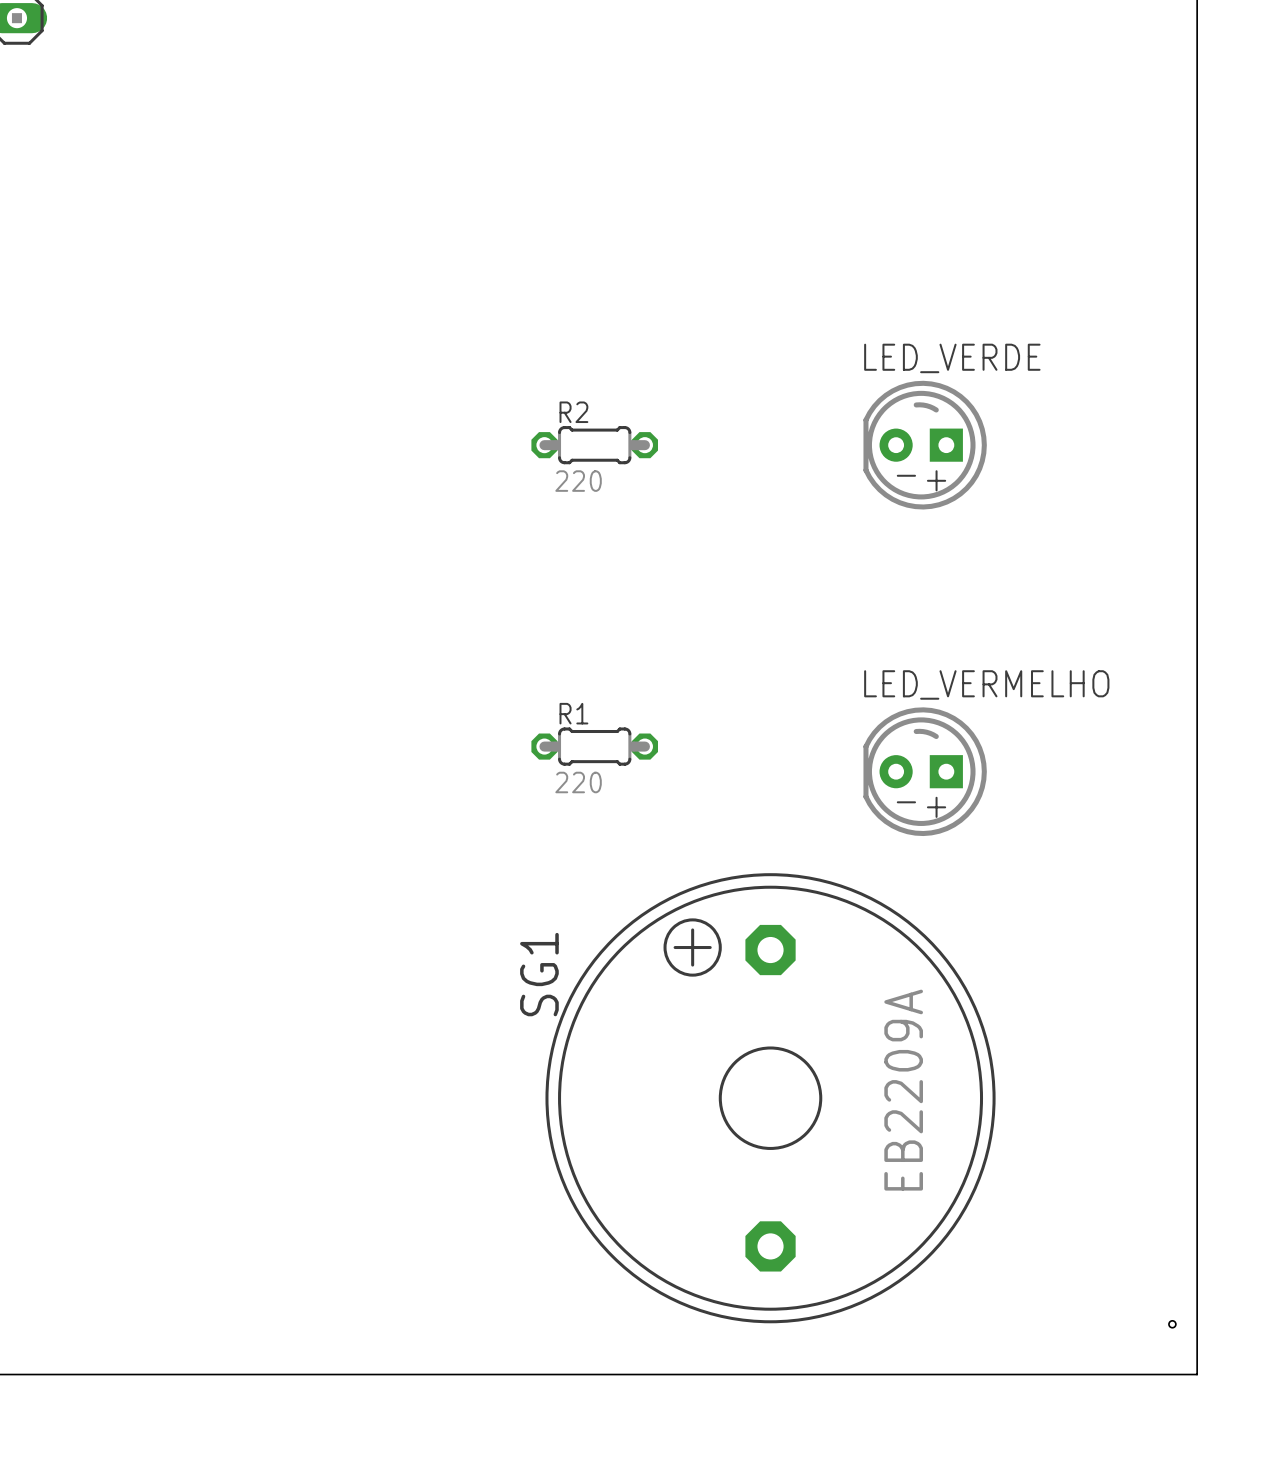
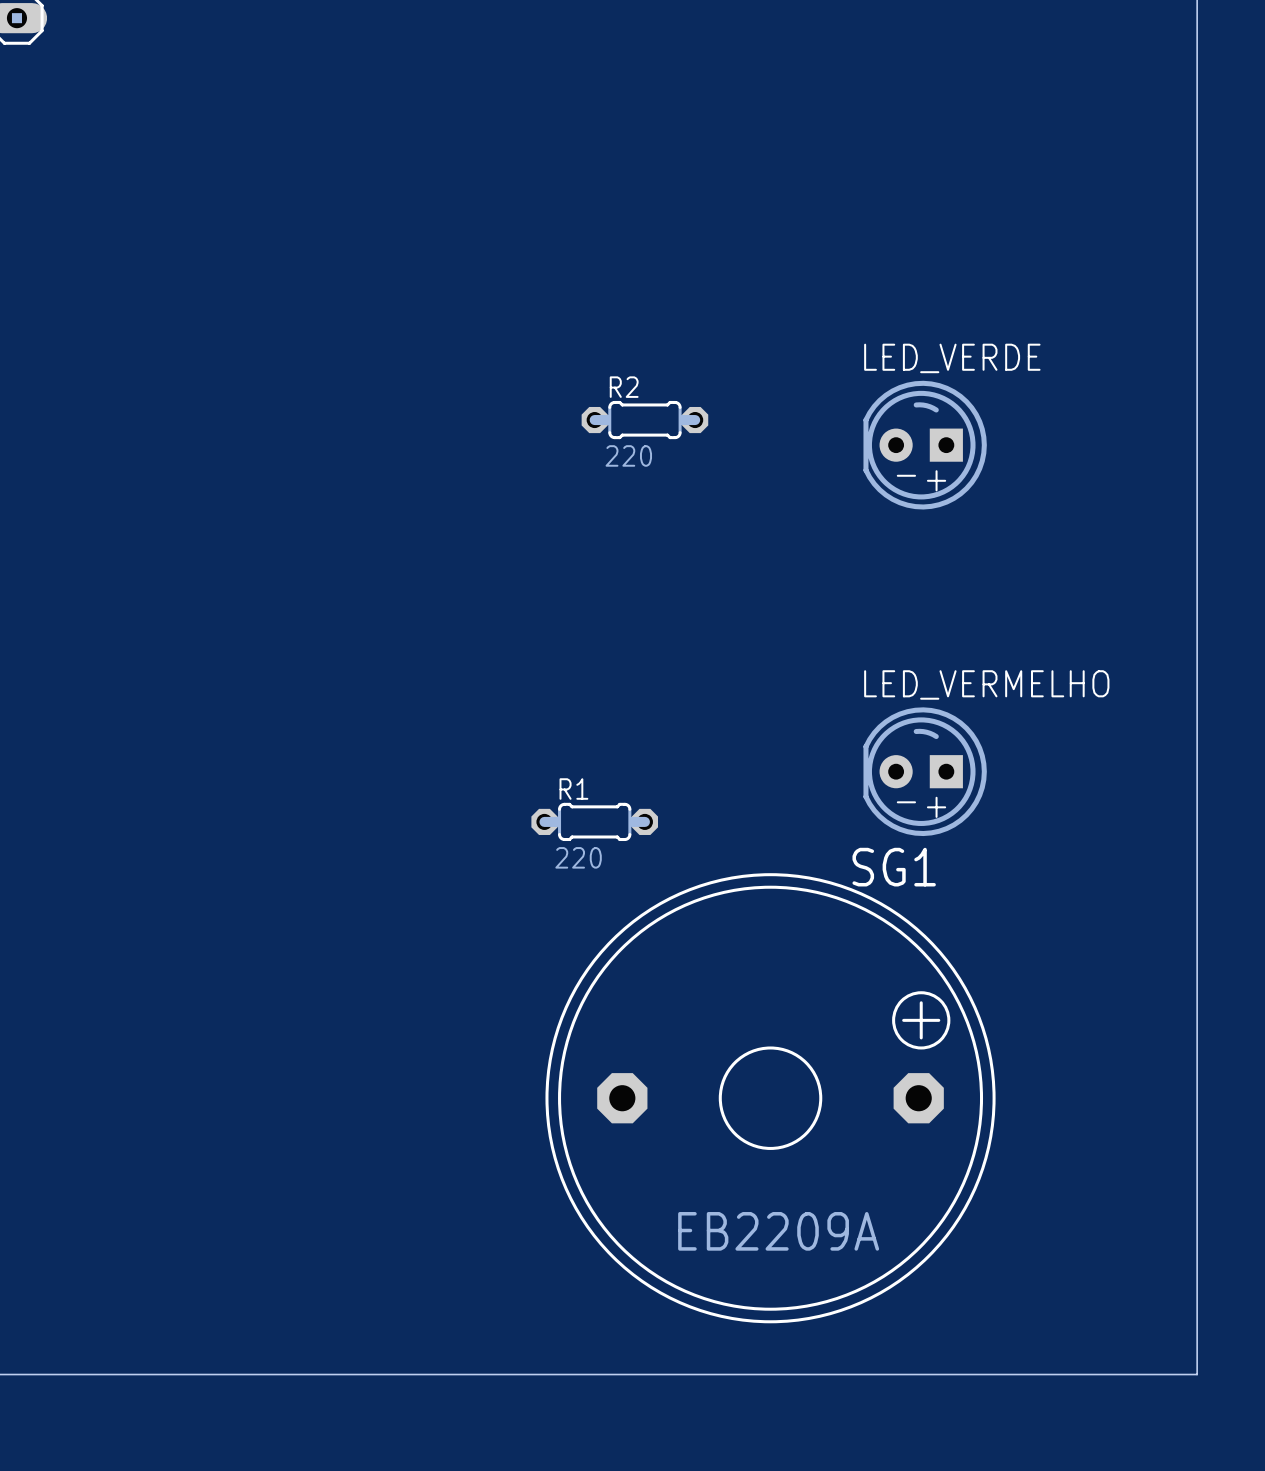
R2 position: (594, 445) -> (644, 420)
R1 position: (594, 746) -> (594, 821)
SG1 rotation: 0° (770, 1098) -> 90° clockwise (770, 1098)
hole: (1172, 1324) -> none

